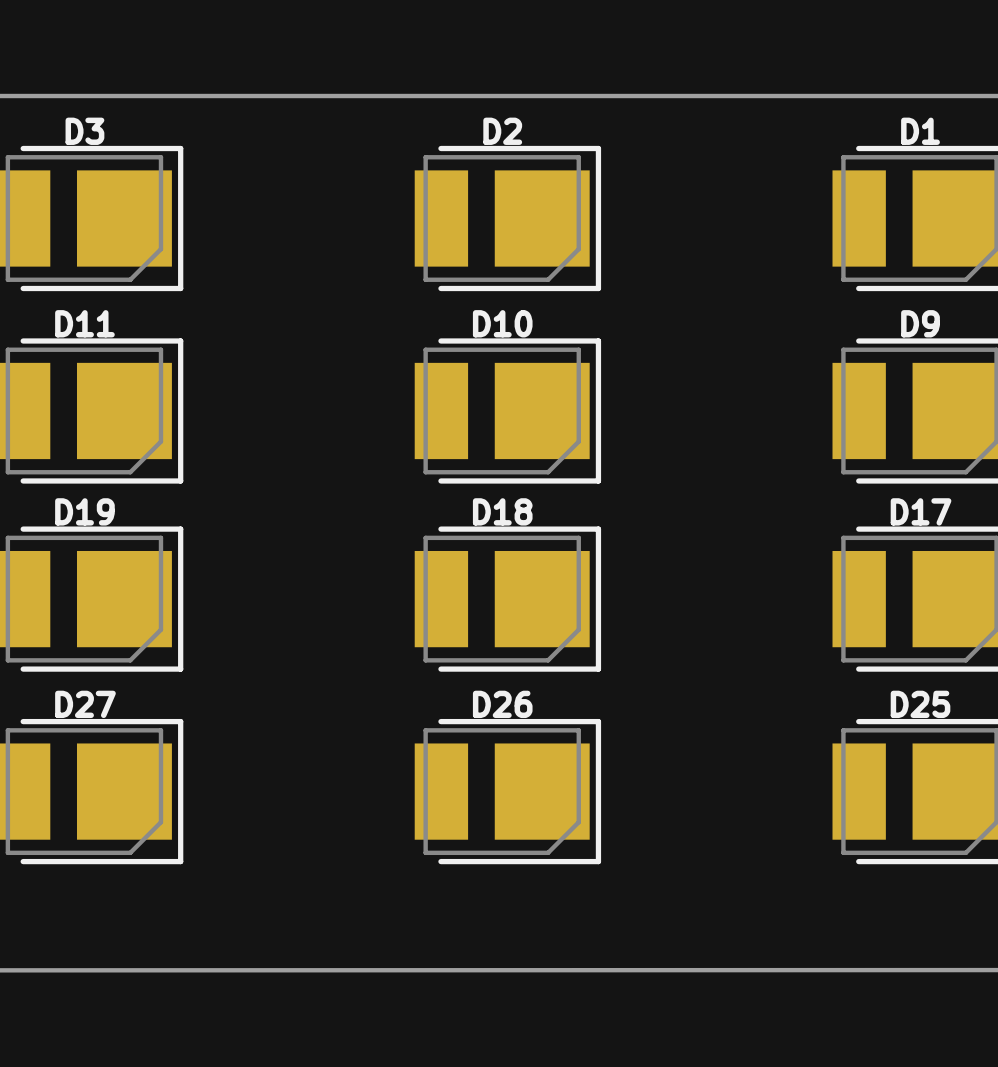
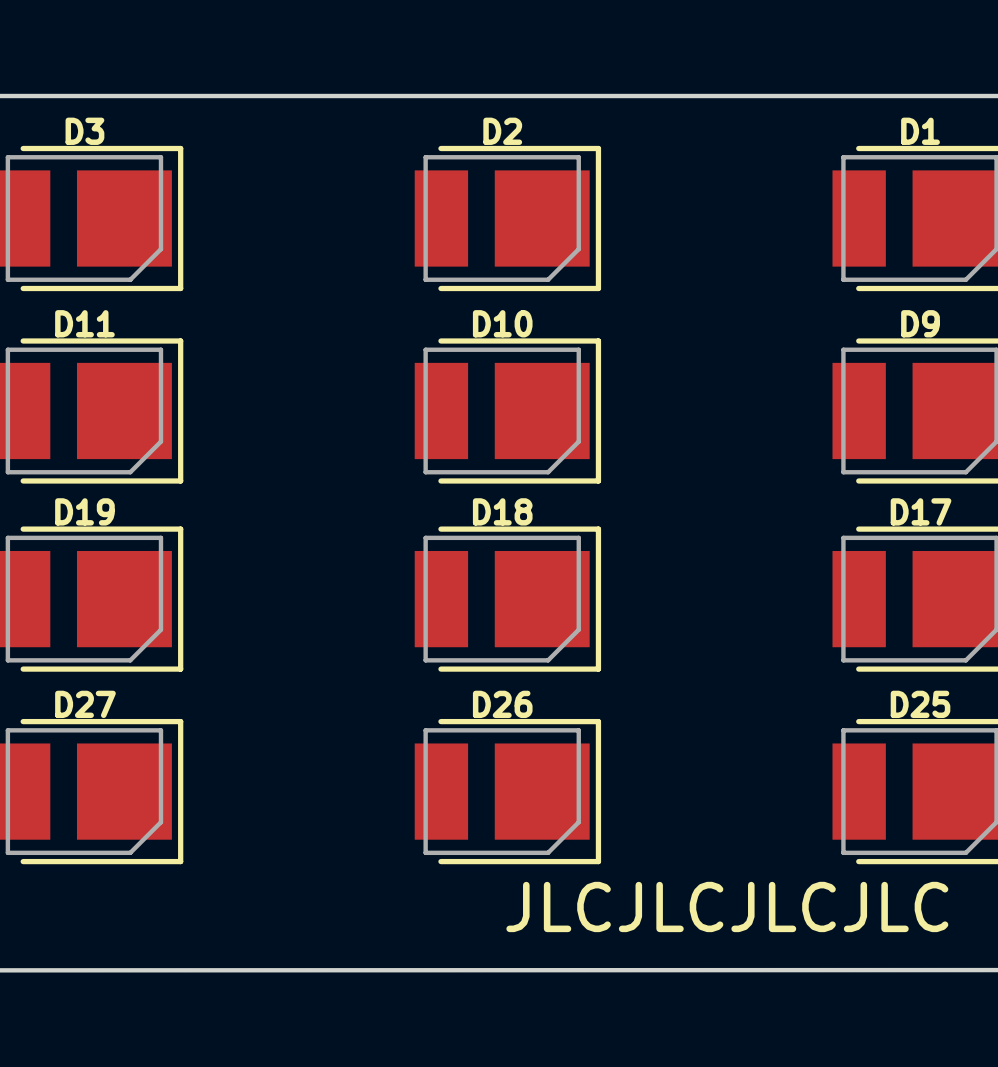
text: none -> JLCJLCJLCJLC (727, 906)

